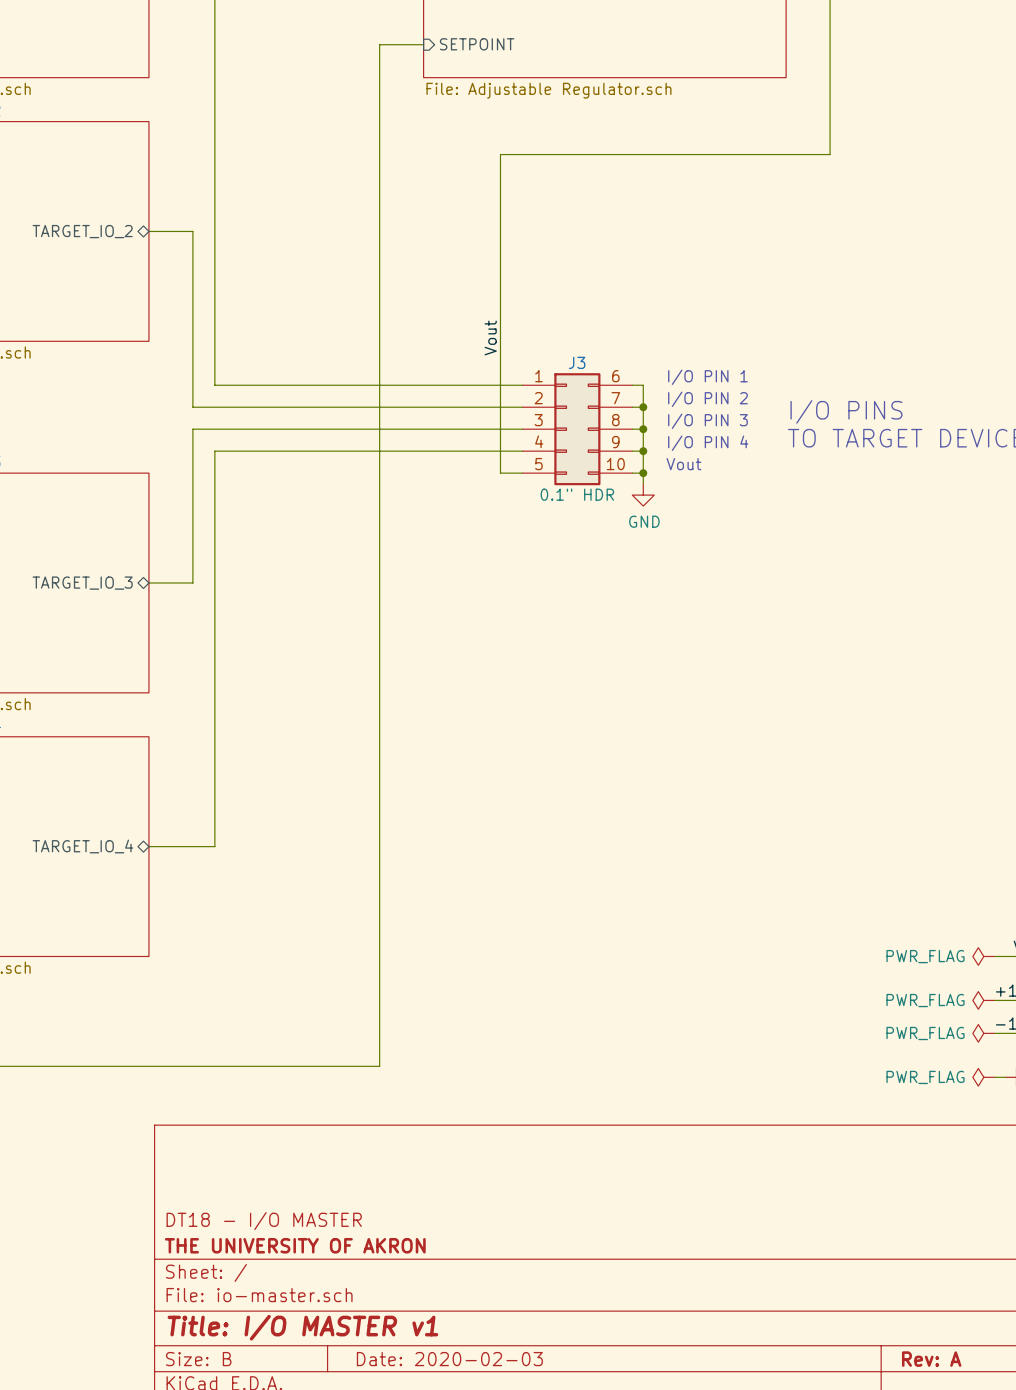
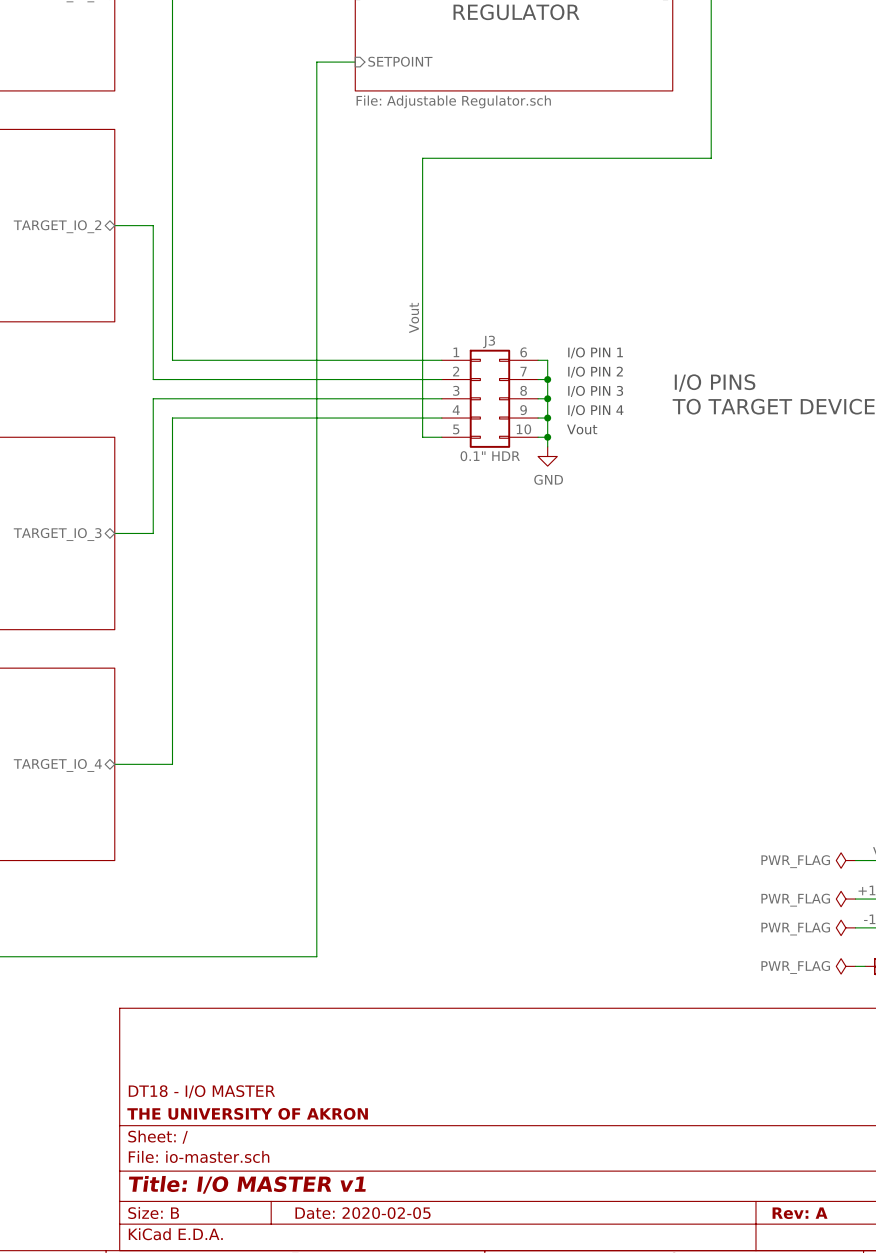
title block: Date: 2020-02-03 (449, 1359) -> Date: 2020-02-05 (363, 1213)

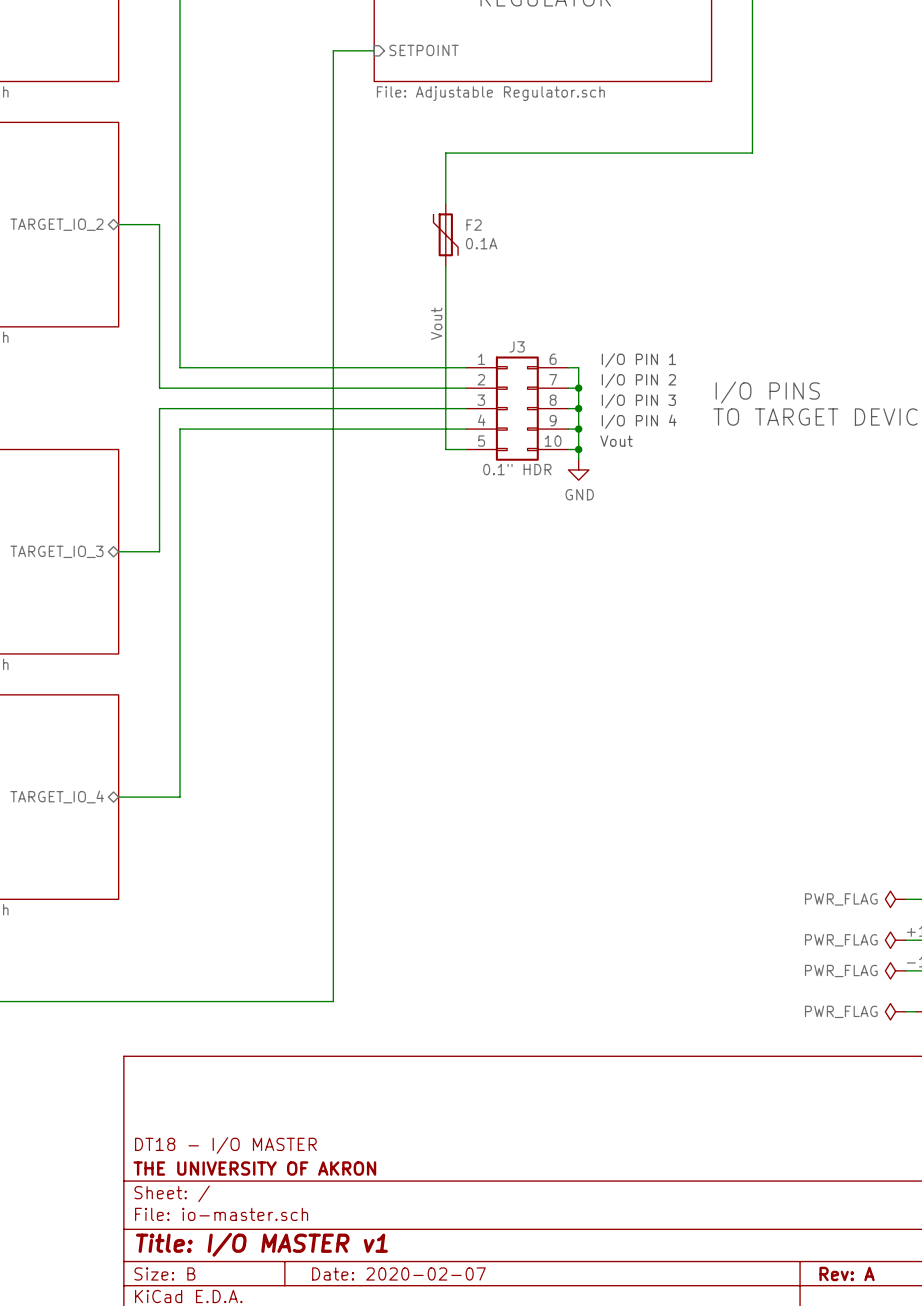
F2: none -> 0.1A (445, 234)
title block: Date: 2020-02-05 (363, 1213) -> Date: 2020-02-07 (398, 1273)

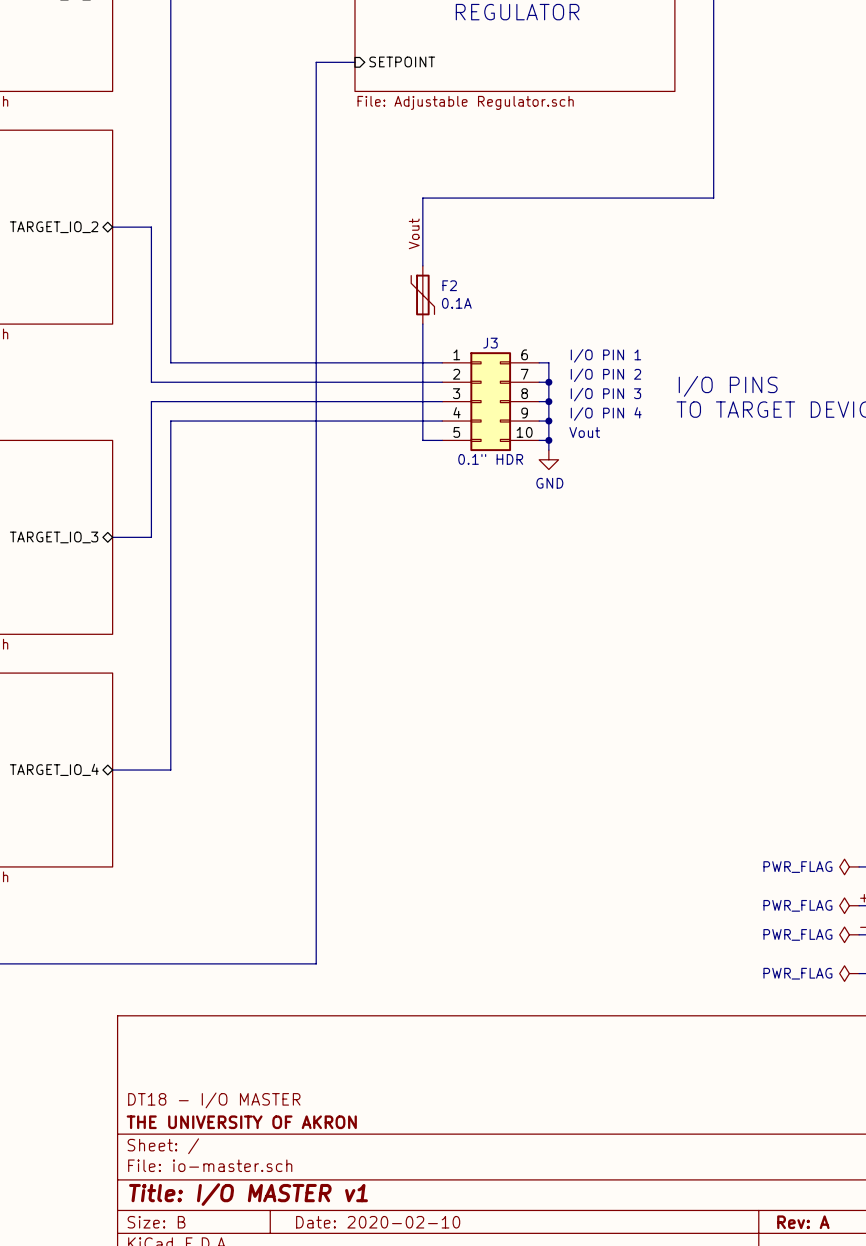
wire: (752, 153) (445, 153) (445, 193) -> (713, 159) (713, 198) (422, 198)
F2 position: (445, 234) -> (422, 294)
label position: Vout (436, 323) -> Vout (414, 233)
title block: Date: 2020-02-07 (398, 1273) -> Date: 2020-02-10 (378, 1222)

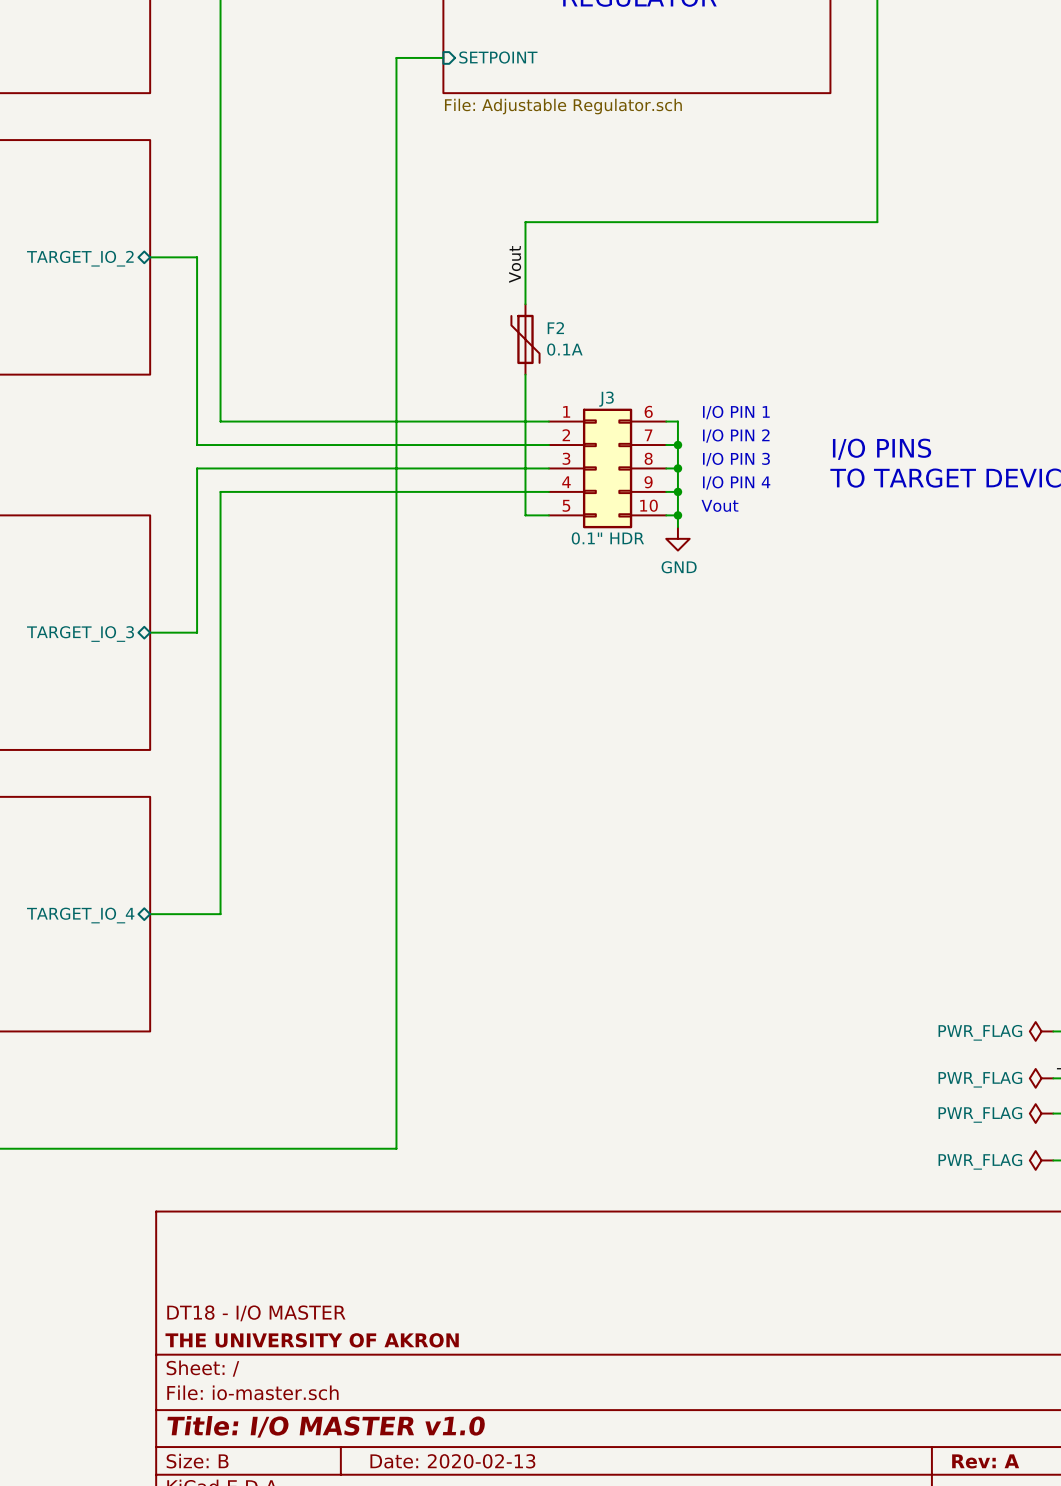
title block: Title: I/O MASTER v1 (248, 1194) -> Title: I/O MASTER v1.0 (326, 1426)
title block: Date: 2020-02-10 (378, 1222) -> Date: 2020-02-13 (452, 1461)

